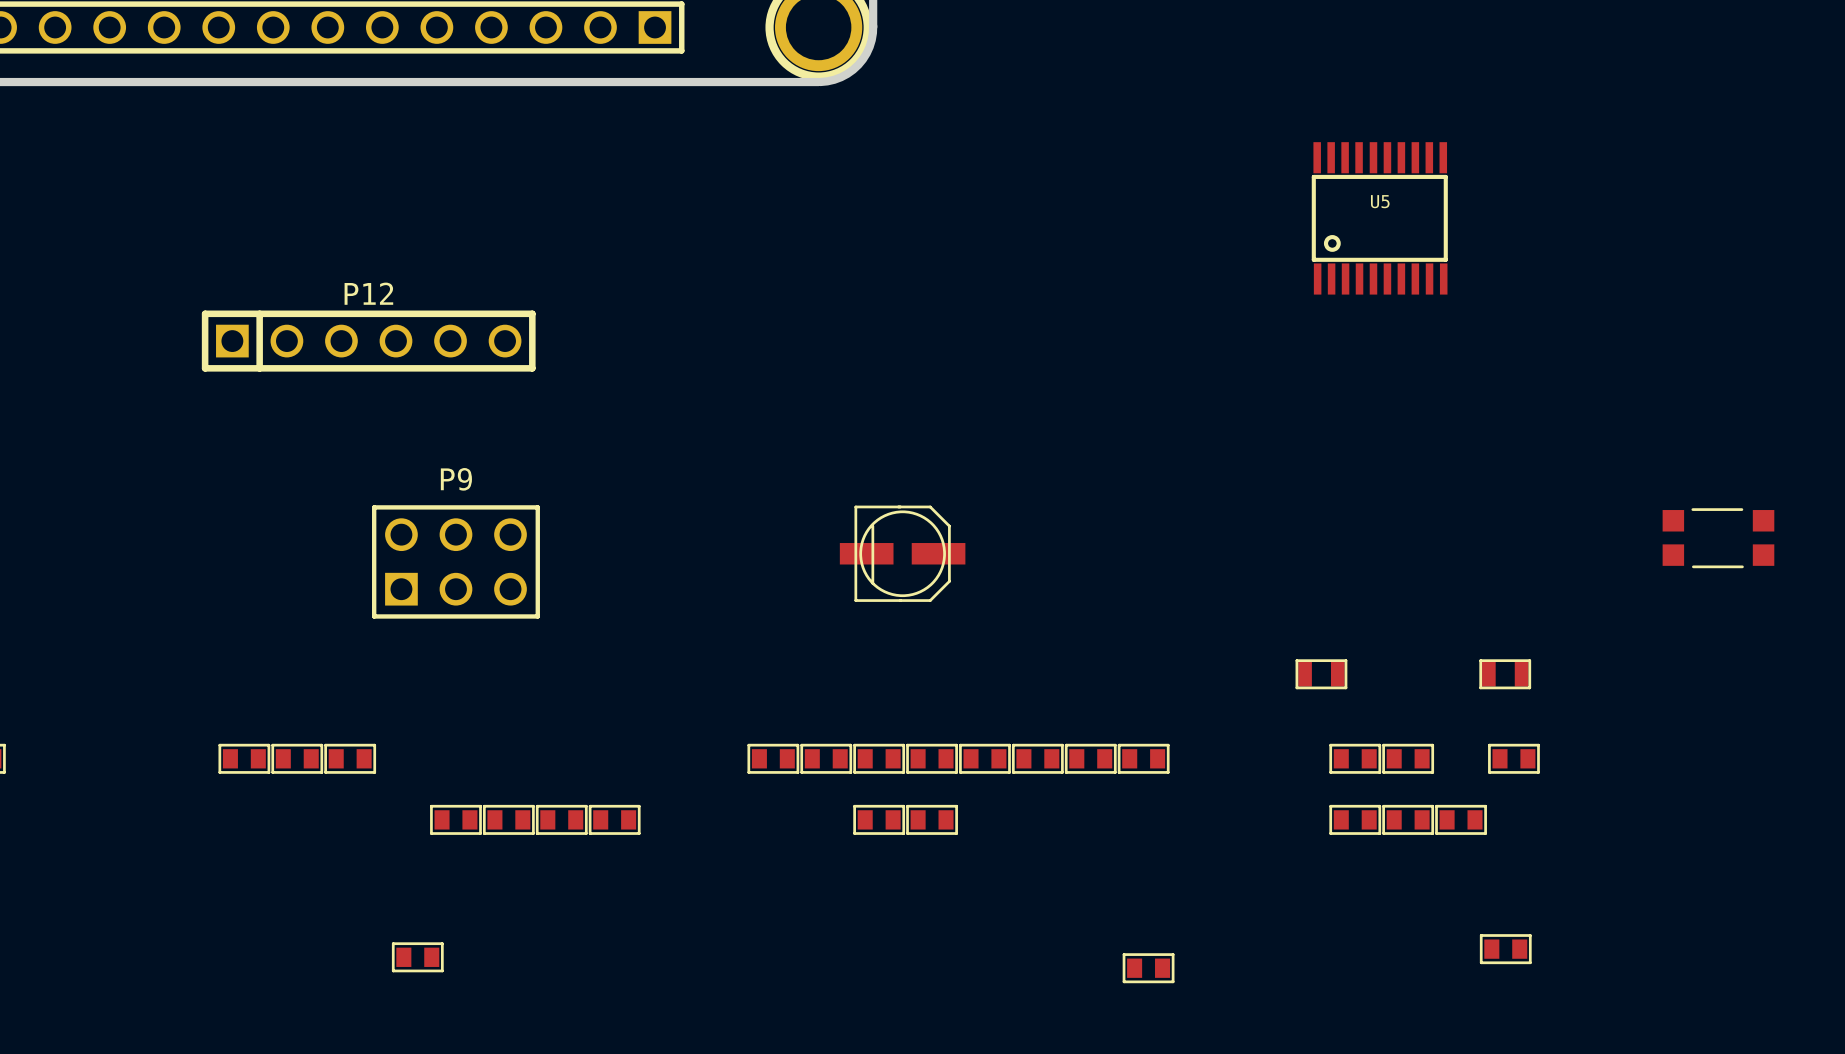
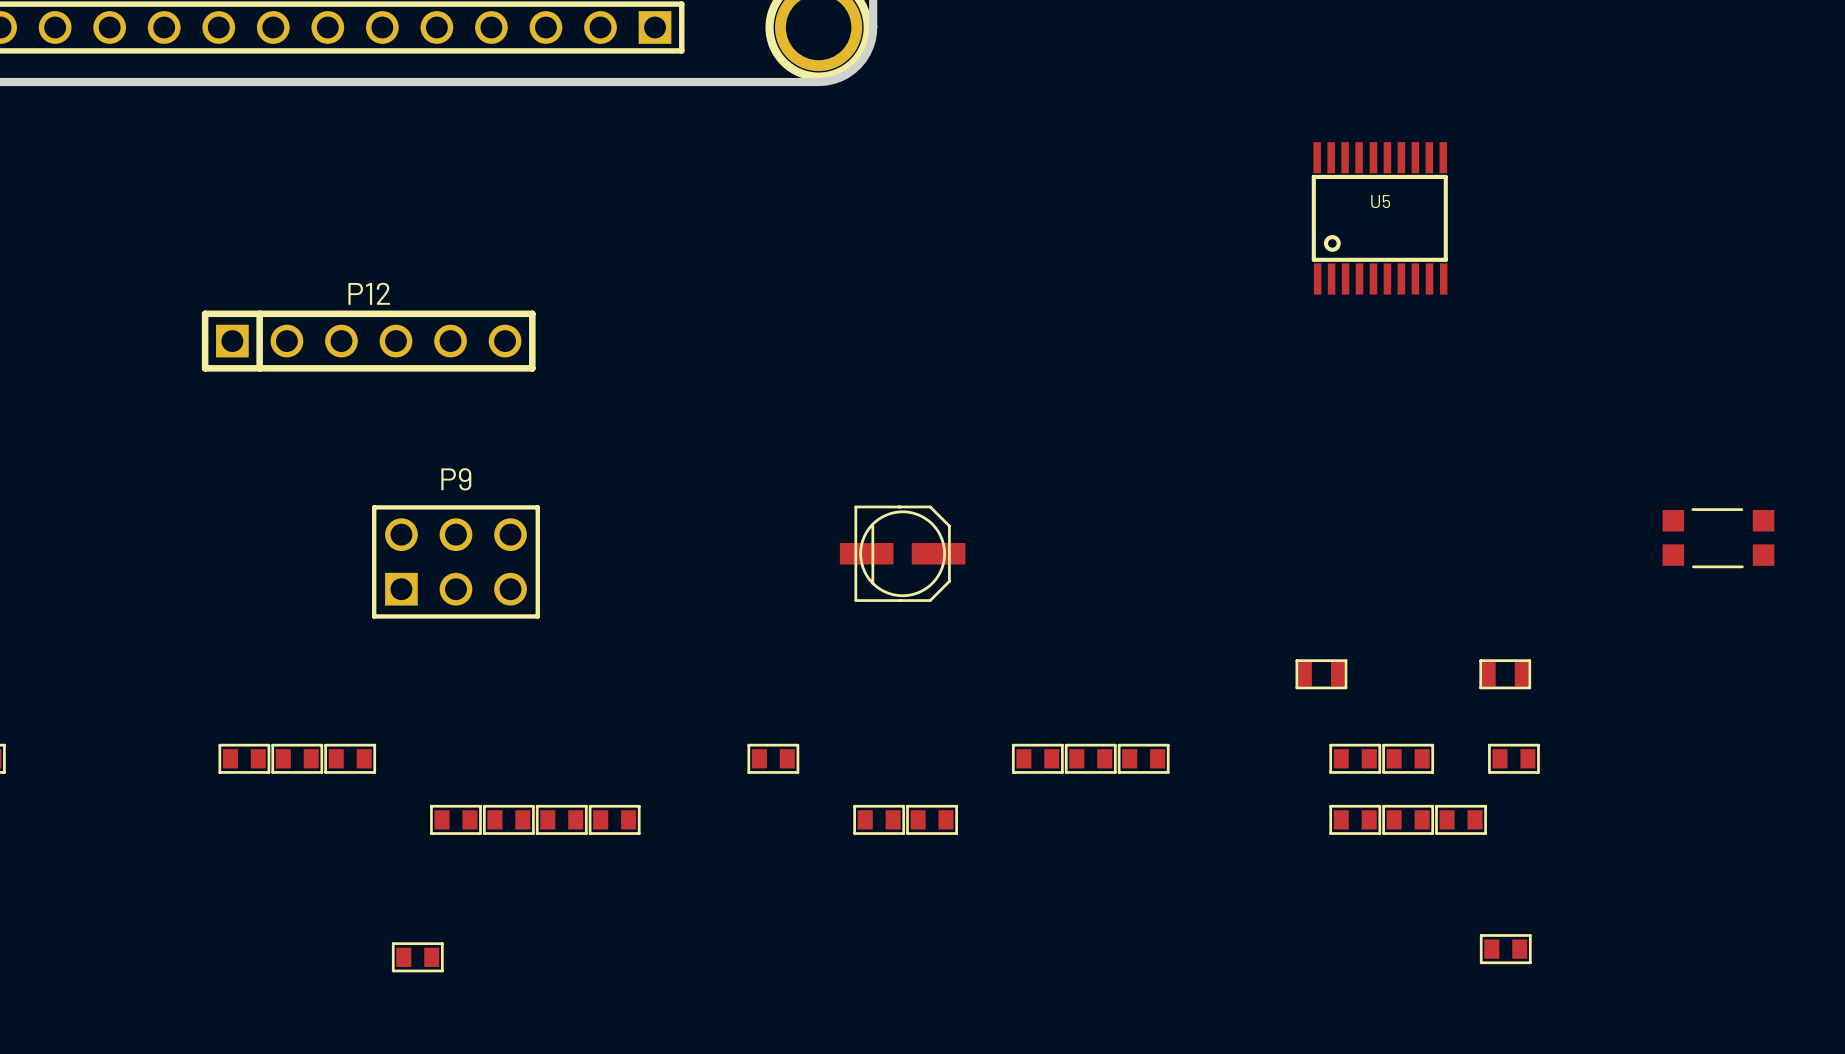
part: (826, 758) -> none
part: (879, 758) -> none
part: (932, 758) -> none
part: (984, 758) -> none
part: (1148, 968) -> none

